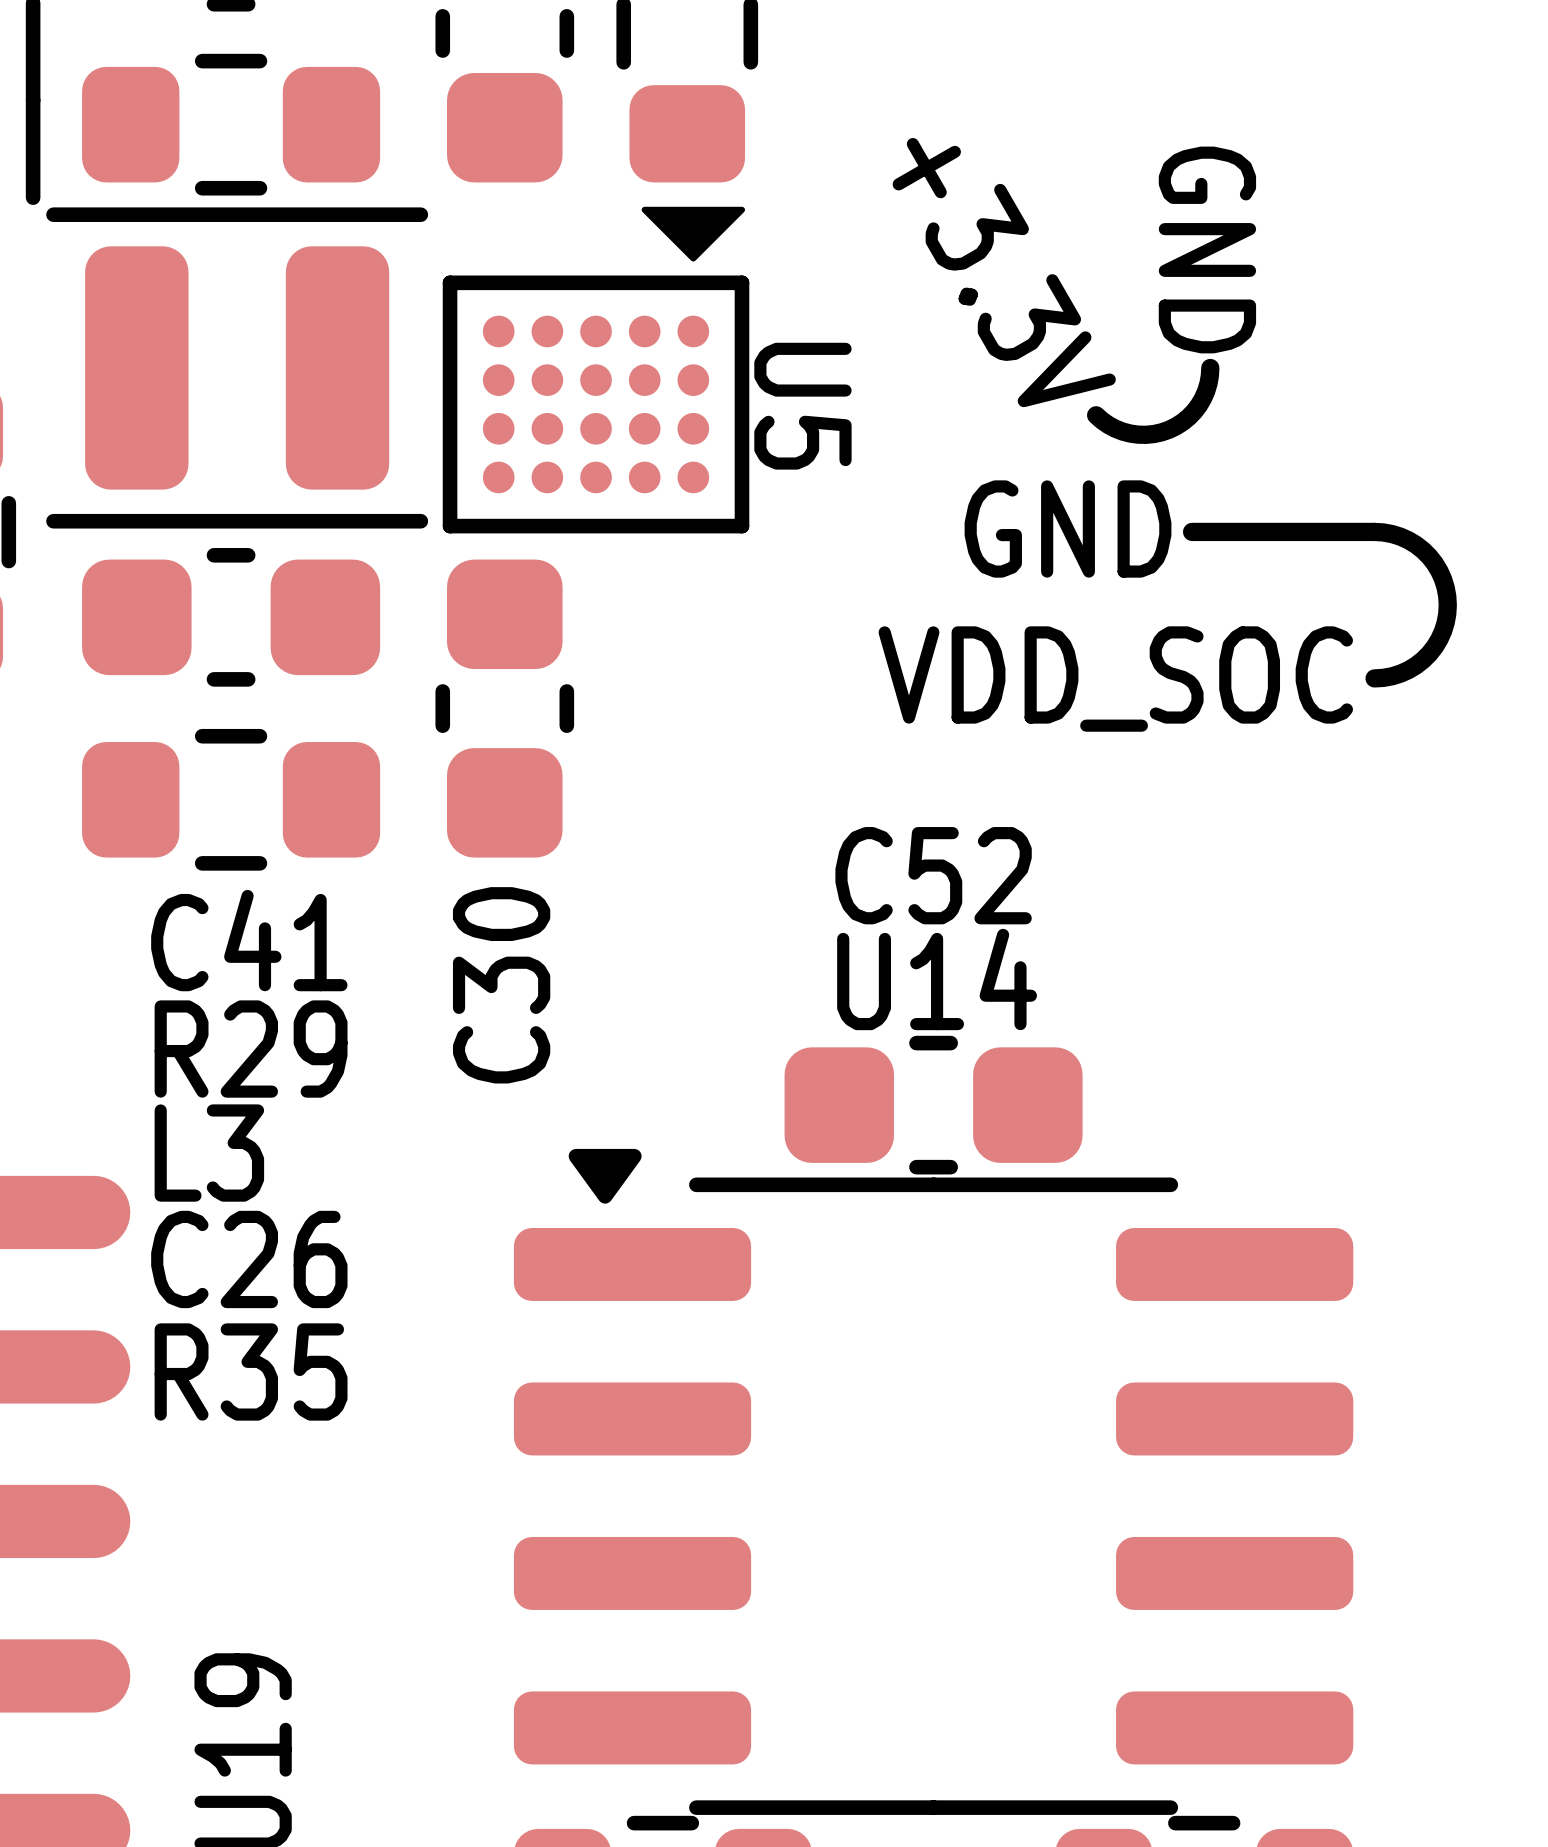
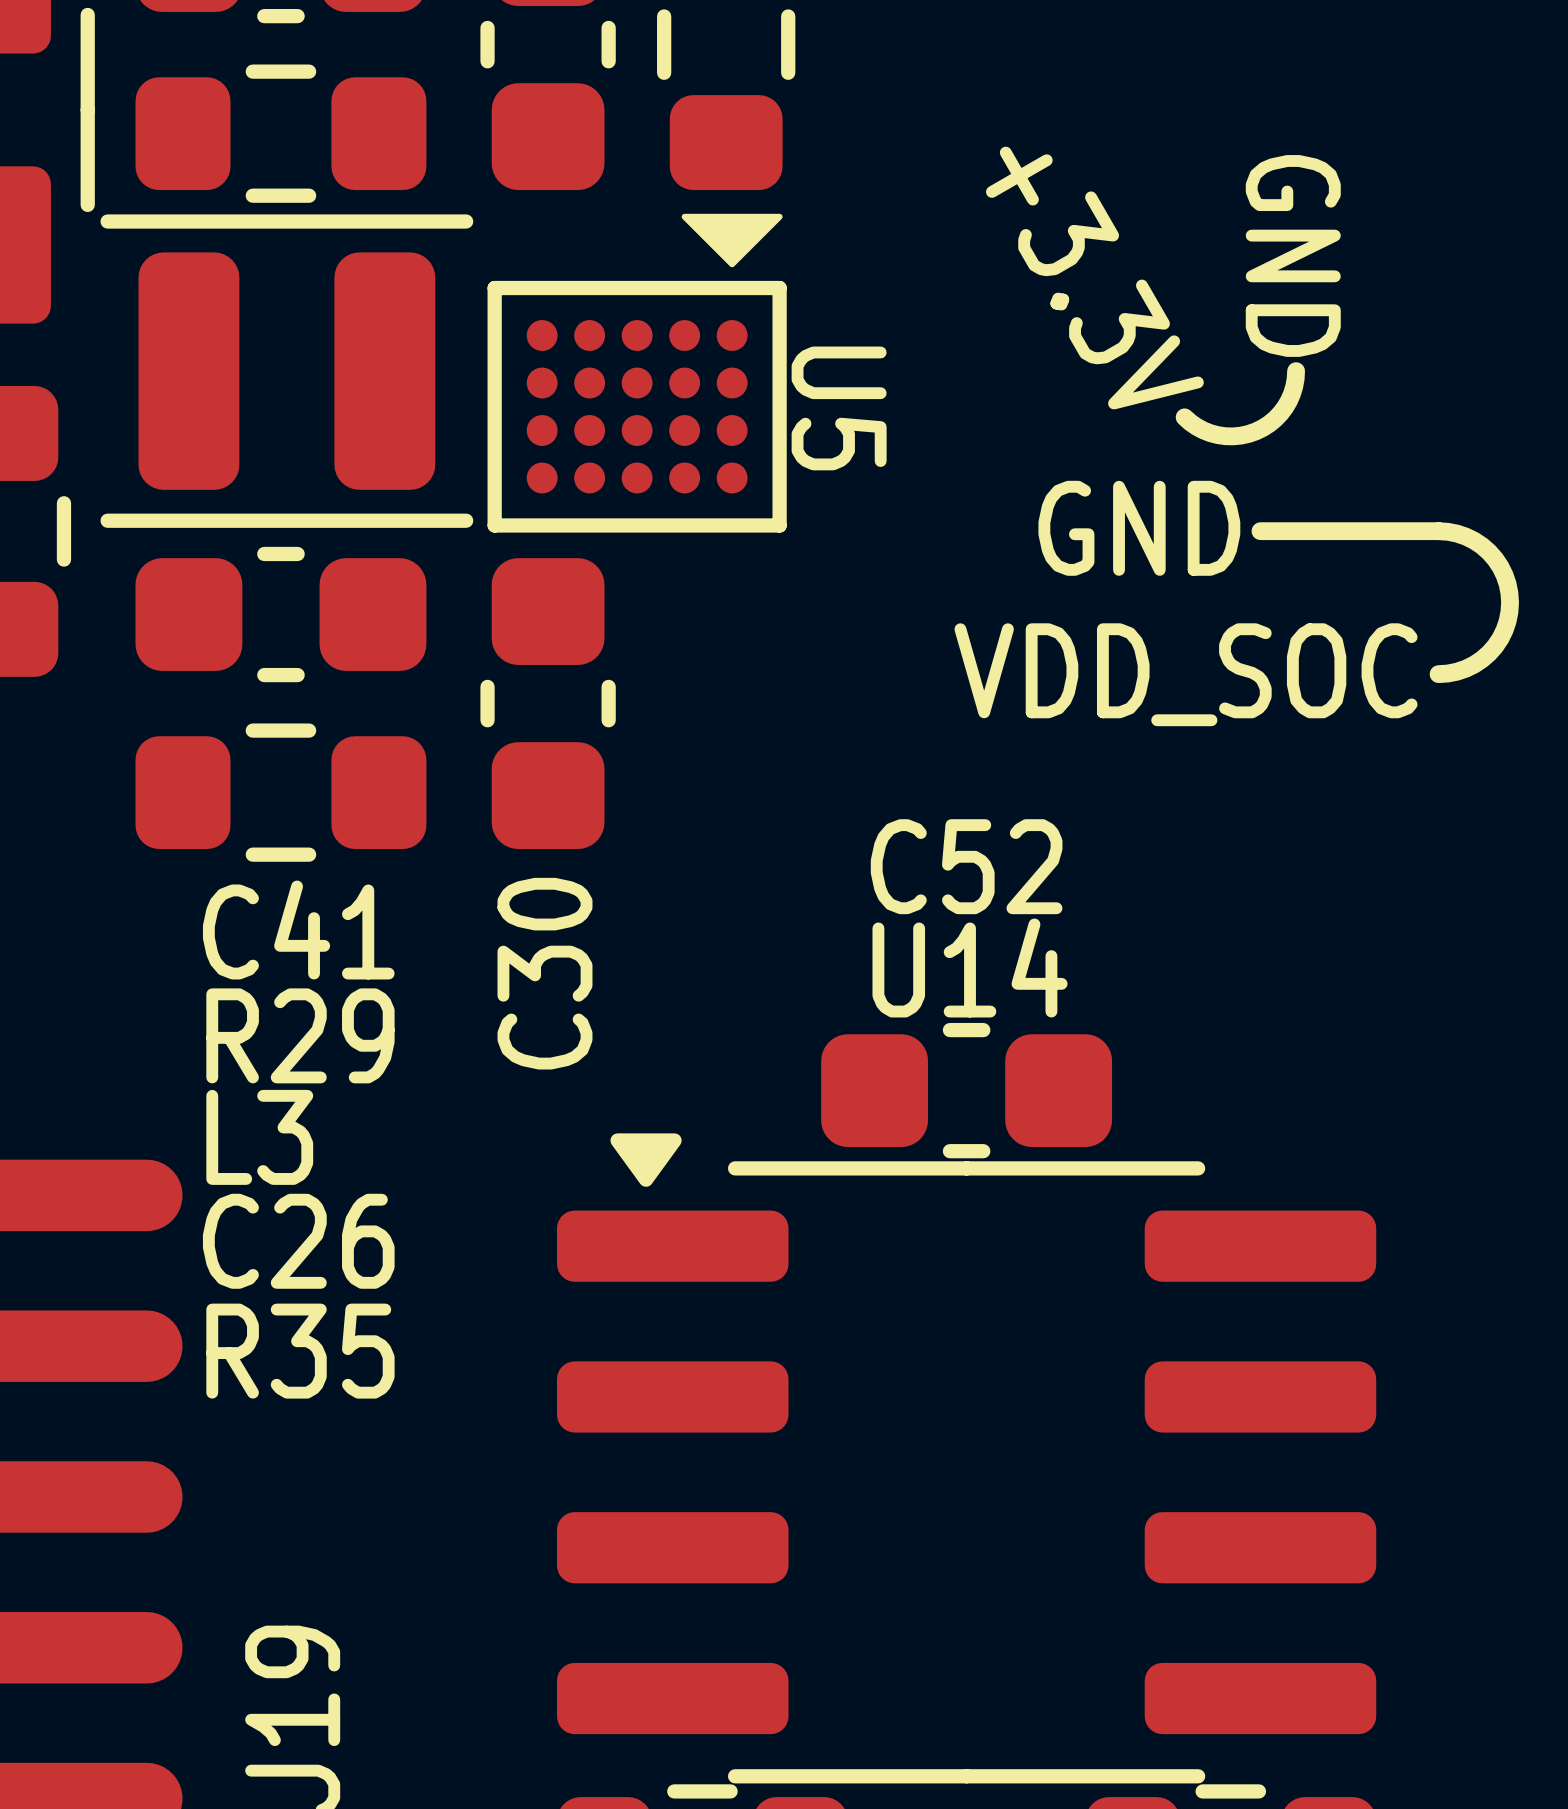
text position: GND (1207, 249) -> GND (1293, 255)
text position: +3.3V (1004, 272) -> +3.3V (1094, 278)
line: (1210, 367) (1206, 391) (1199, 405) (1182, 422) (1169, 429) (1146, 434) (1130, 433) (1115, 428) (1096, 415) -> (1296, 371) (1292, 393) (1285, 407) (1269, 423) (1255, 431) (1241, 435) (1218, 435) (1203, 430) (1184, 417)
text position: GND (1068, 529) -> GND (1139, 528)
line: (1192, 531) (1234, 531) -> none
line: (1374, 531) (1400, 536) (1416, 544) (1429, 556) (1443, 579) (1447, 605) (1443, 631) (1434, 646) (1423, 659) (1400, 673) (1374, 678) -> (1397, 531) (1447, 531) (1465, 536) (1482, 545) (1495, 559) (1507, 584) (1509, 611) (1504, 630) (1495, 646) (1482, 659) (1465, 668) (1438, 674)
text position: VDD_SOC (1115, 679) -> VDD_SOC (1186, 674)

